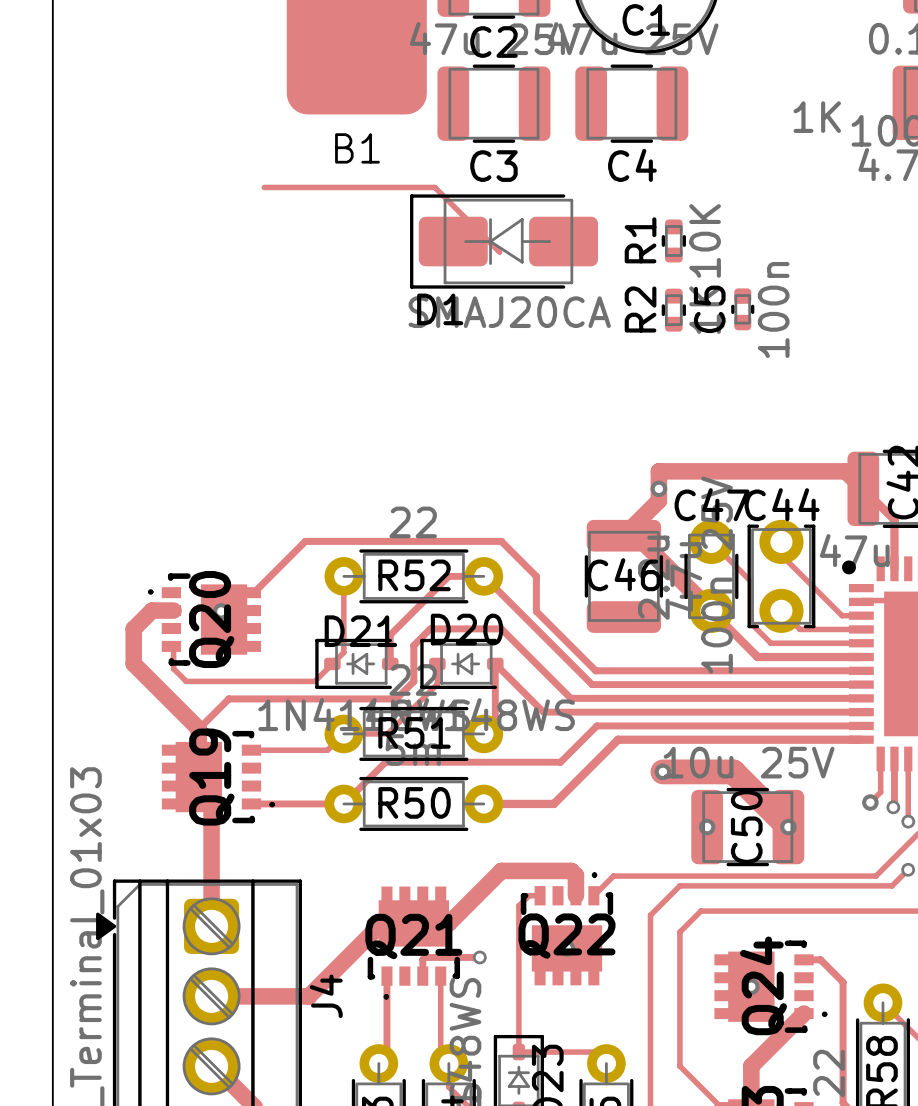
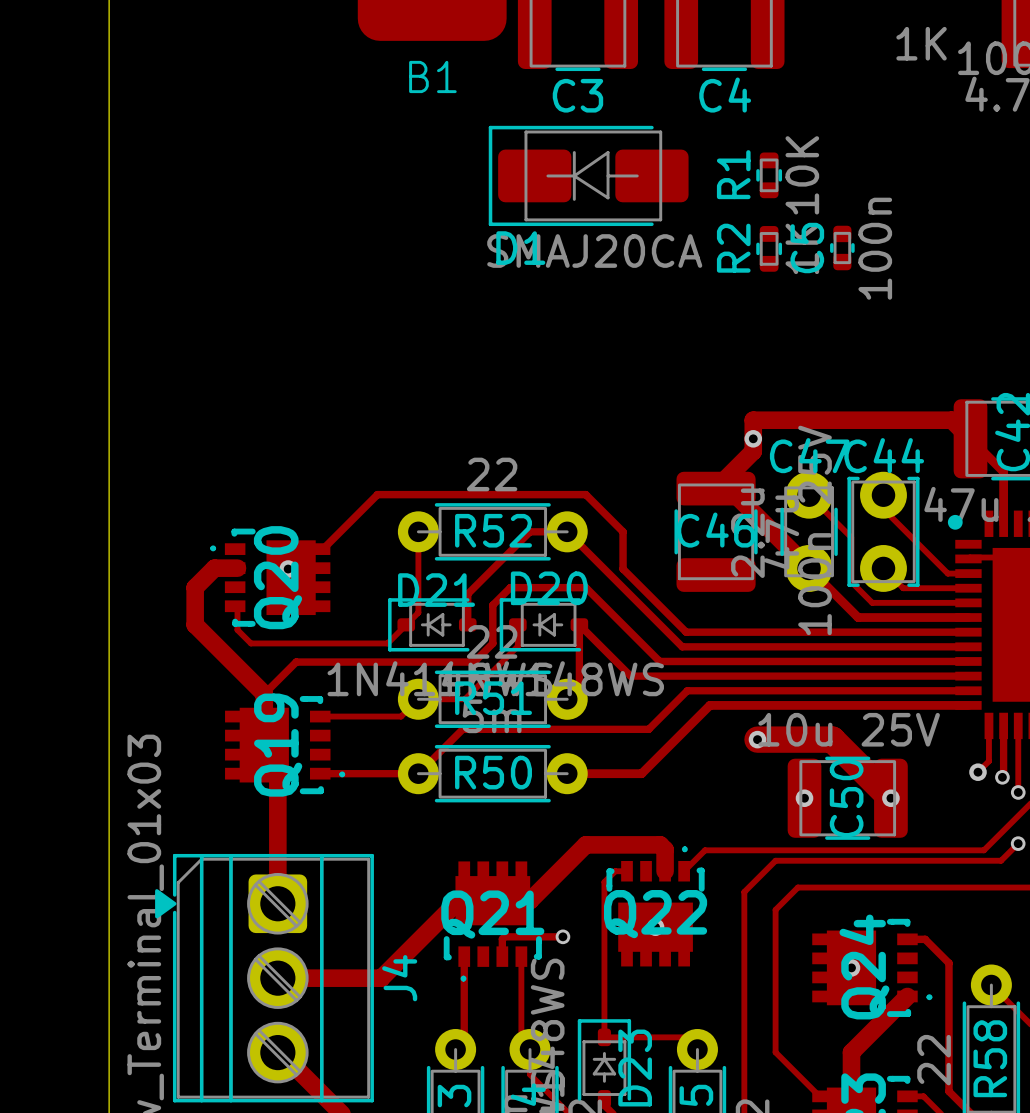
track: (264, 187) (434, 187) (499, 252) -> none

